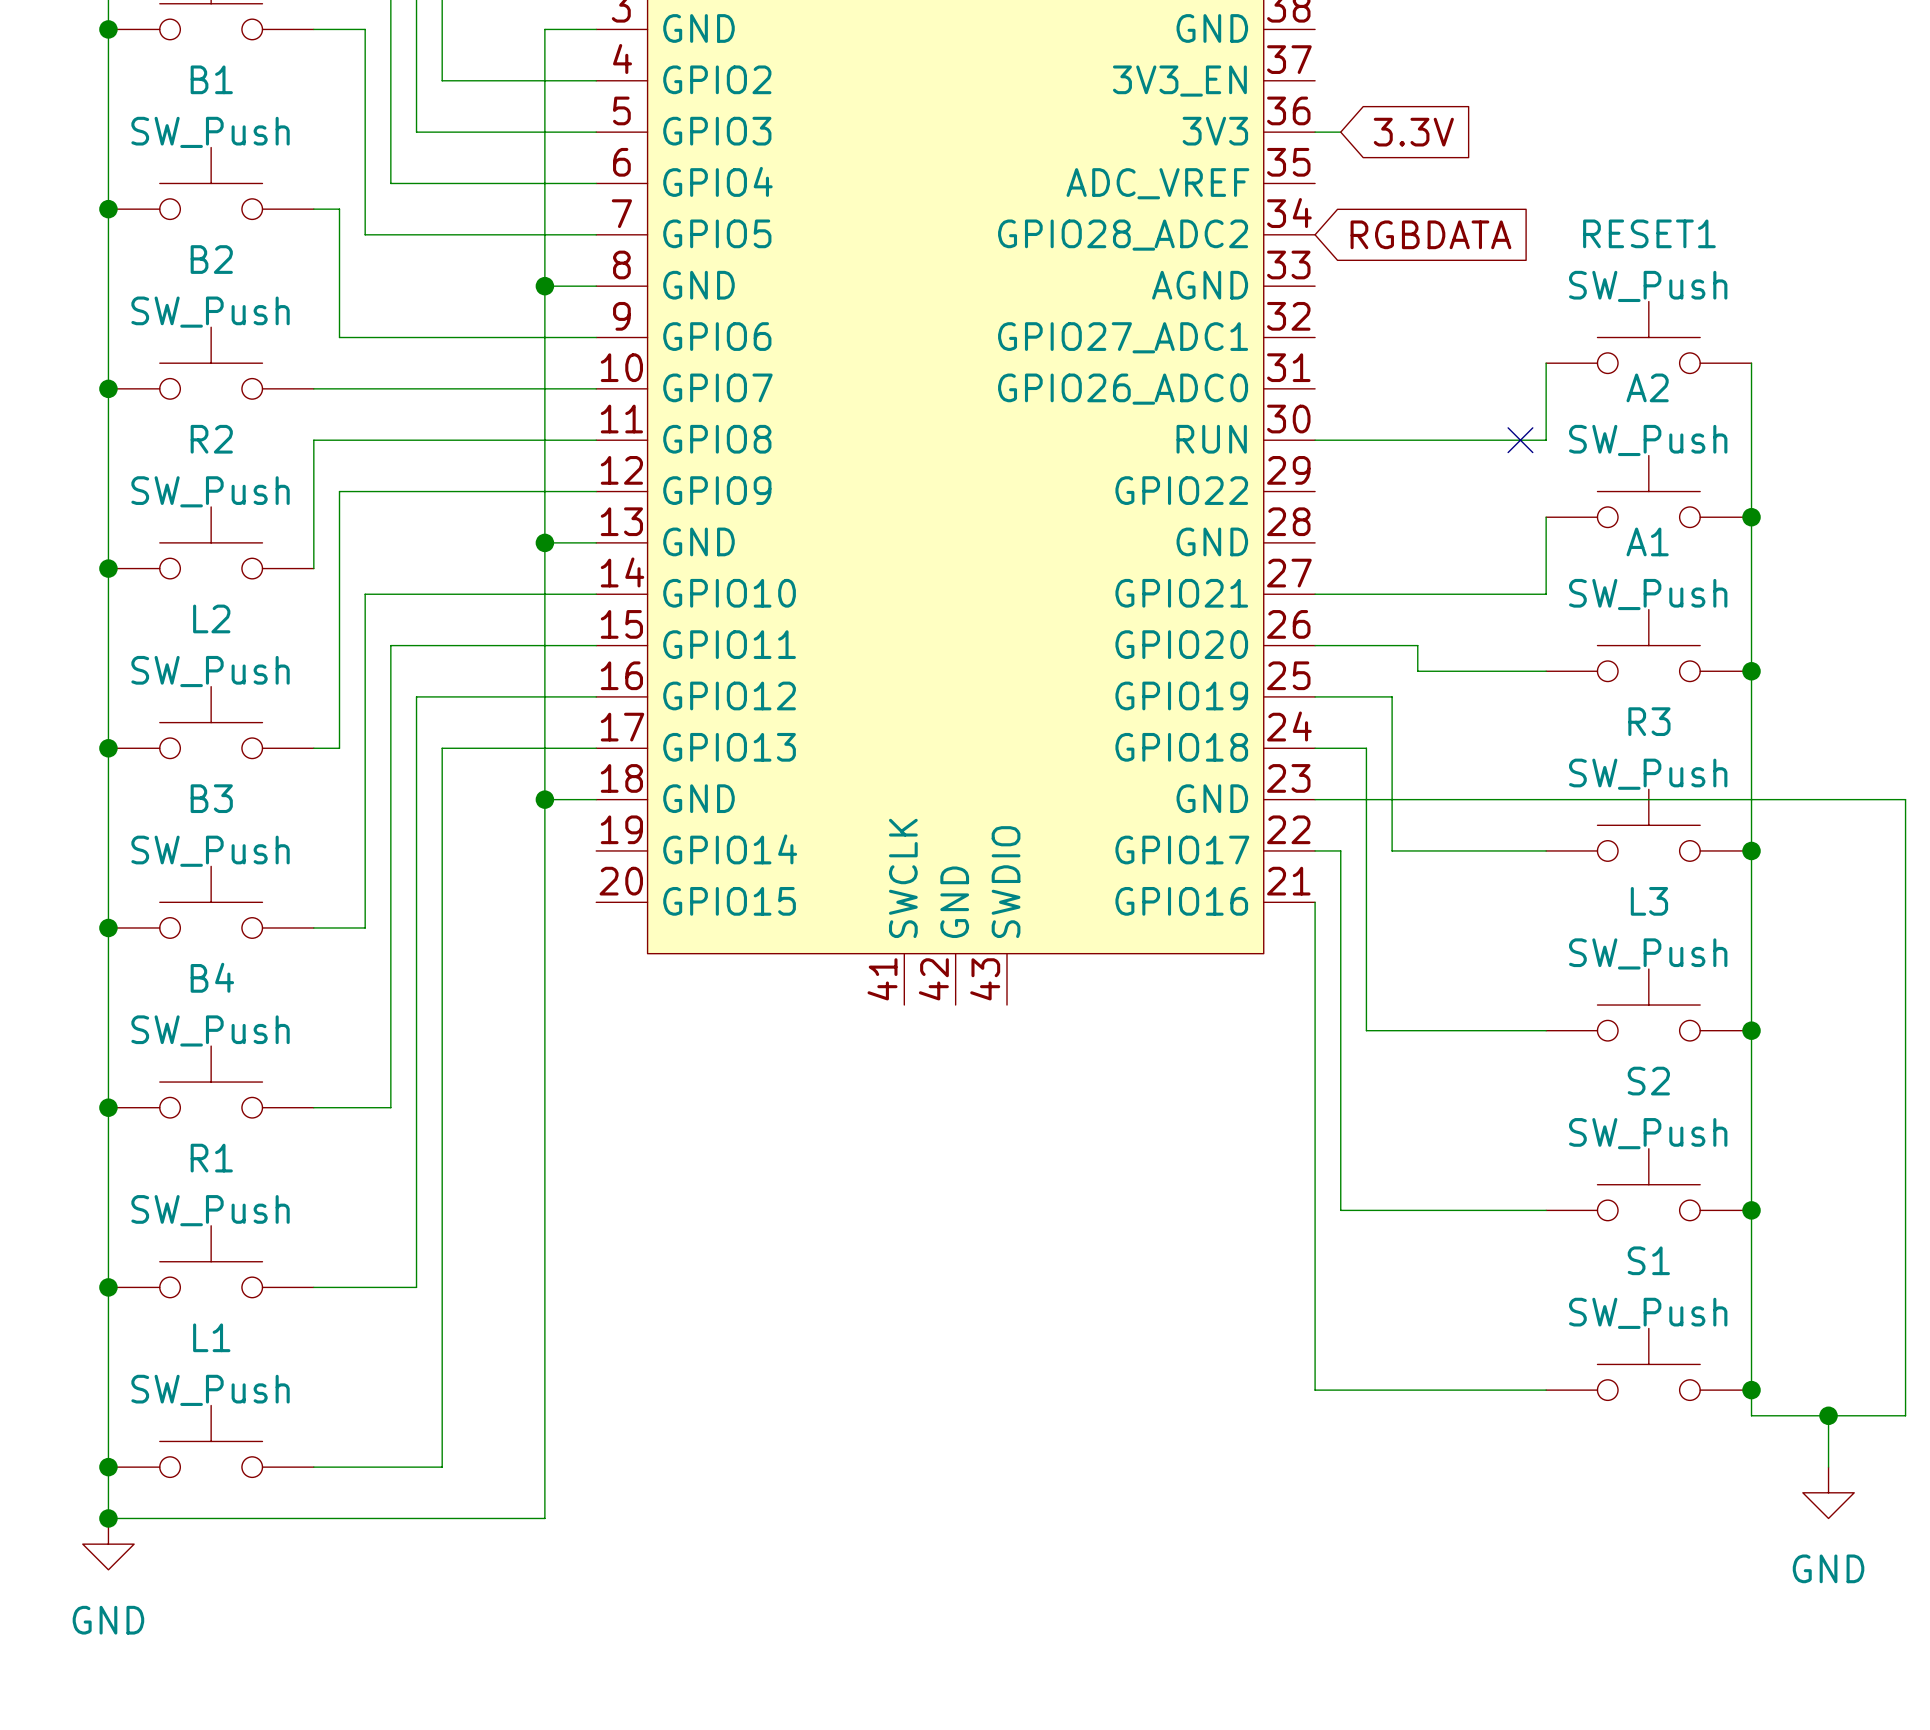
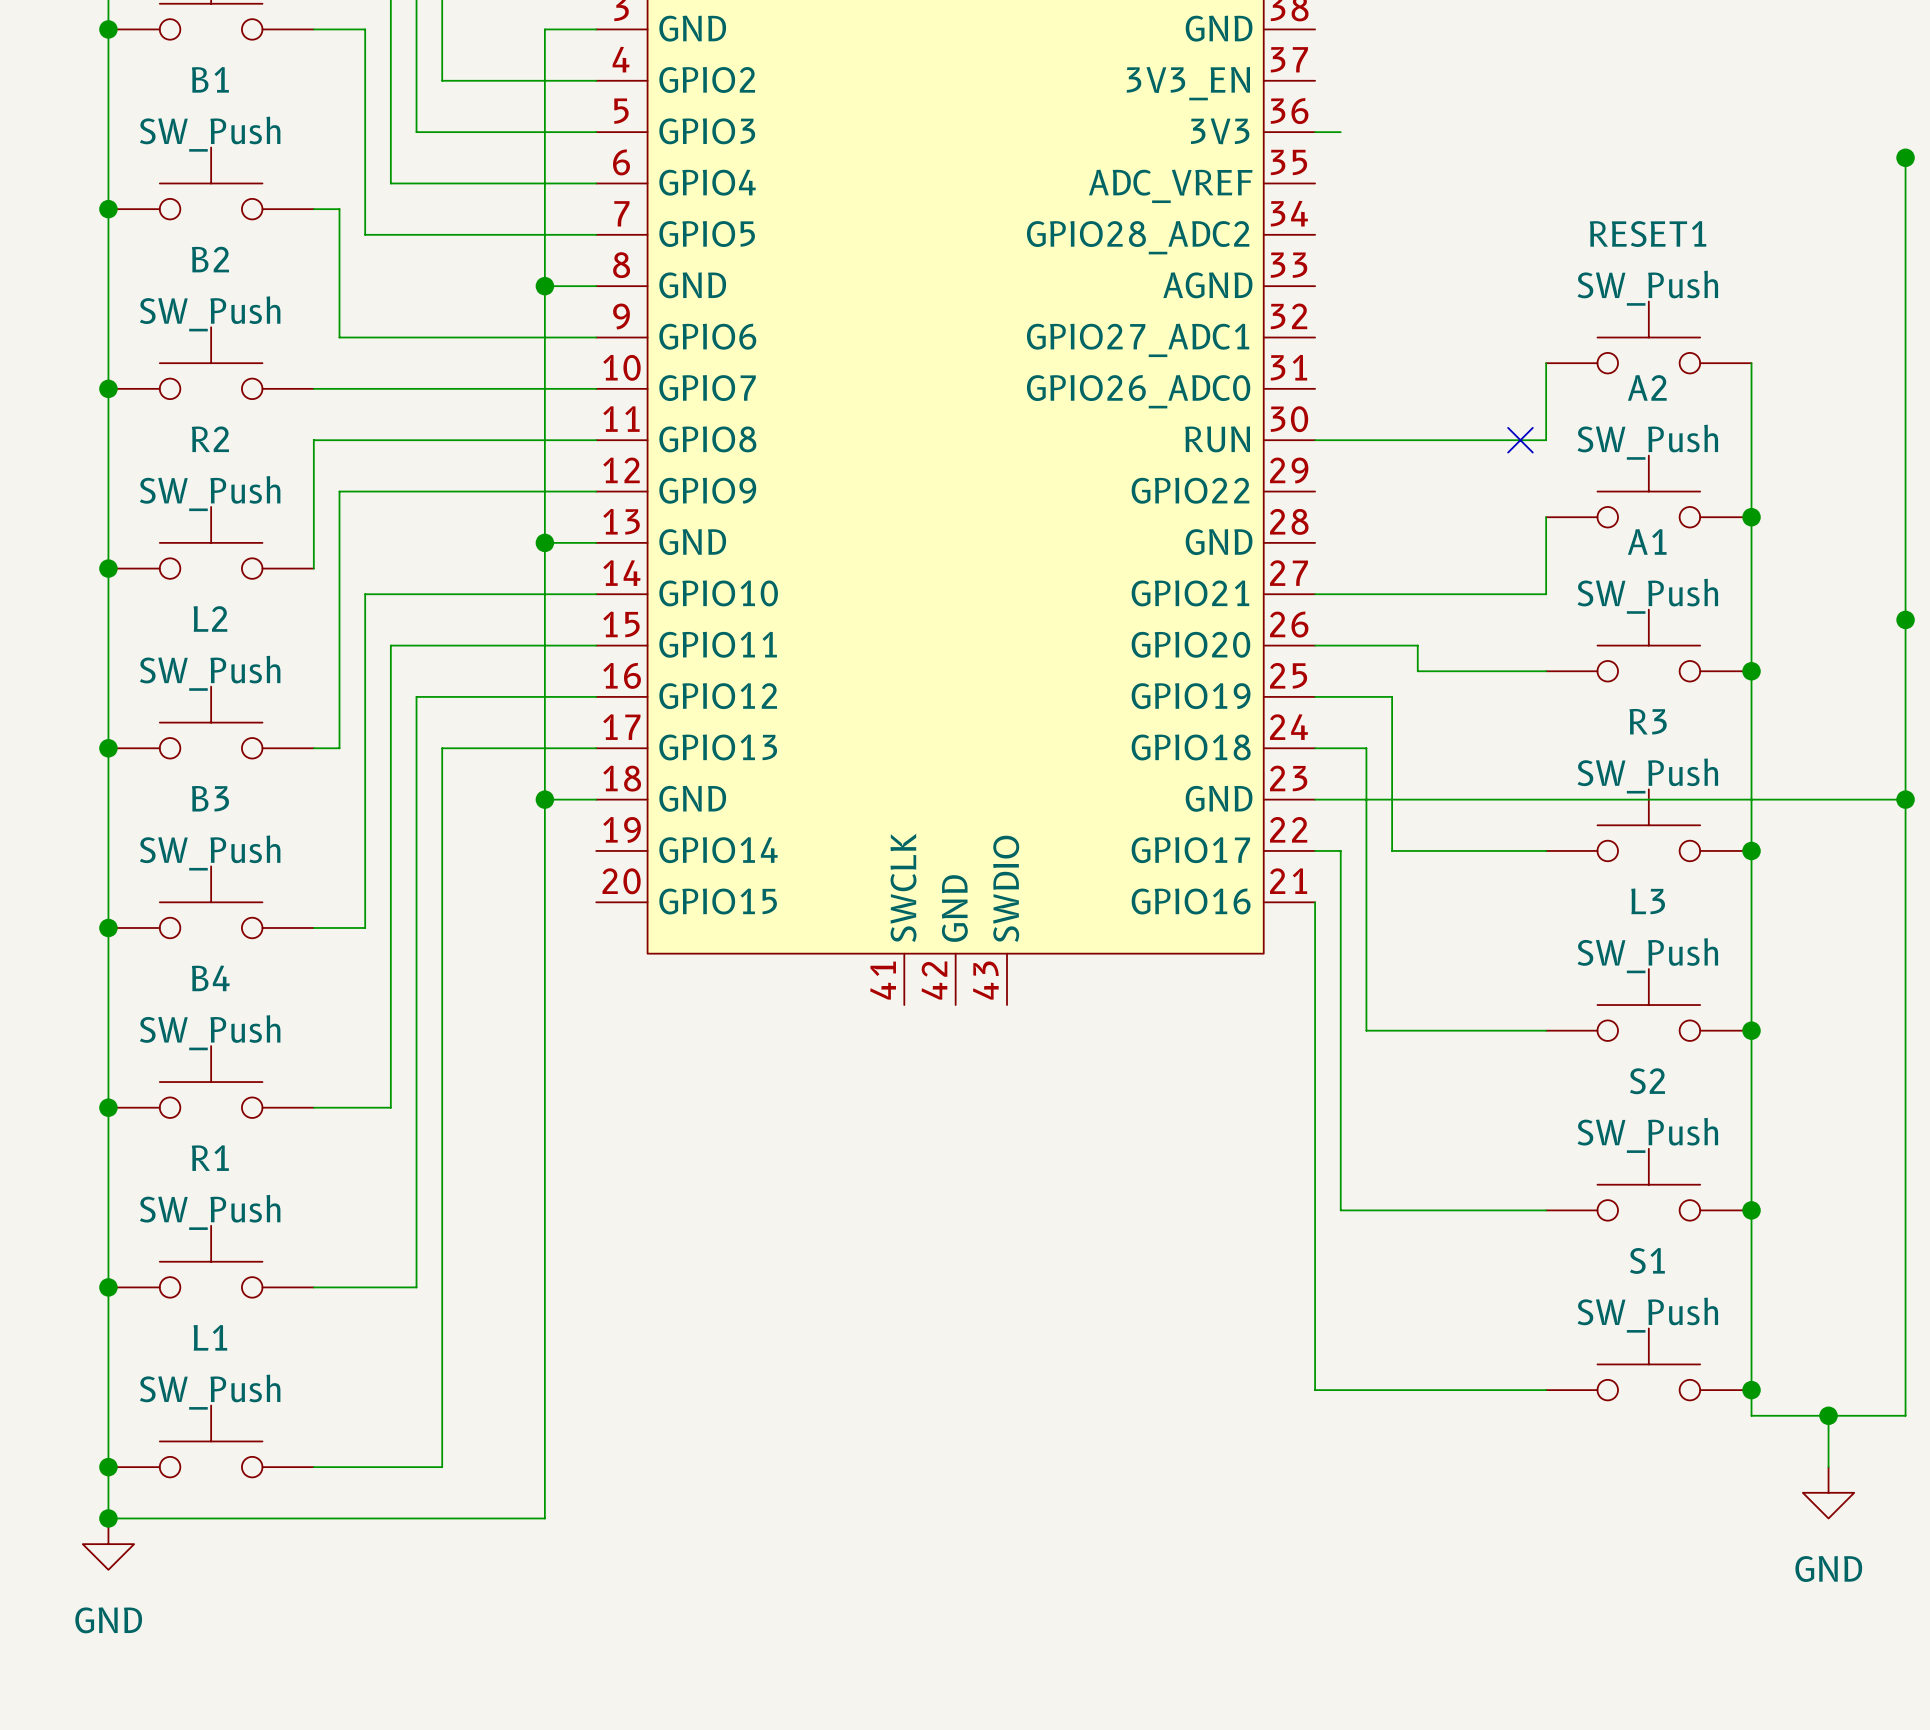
global label: 3.3V (1413, 132) -> none
wire: none -> (1905, 157) (1905, 799)
junction: none -> (1905, 157)
global label: RGBDATA (1430, 234) -> none
junction: none -> (1905, 619)
junction: none -> (1905, 799)

